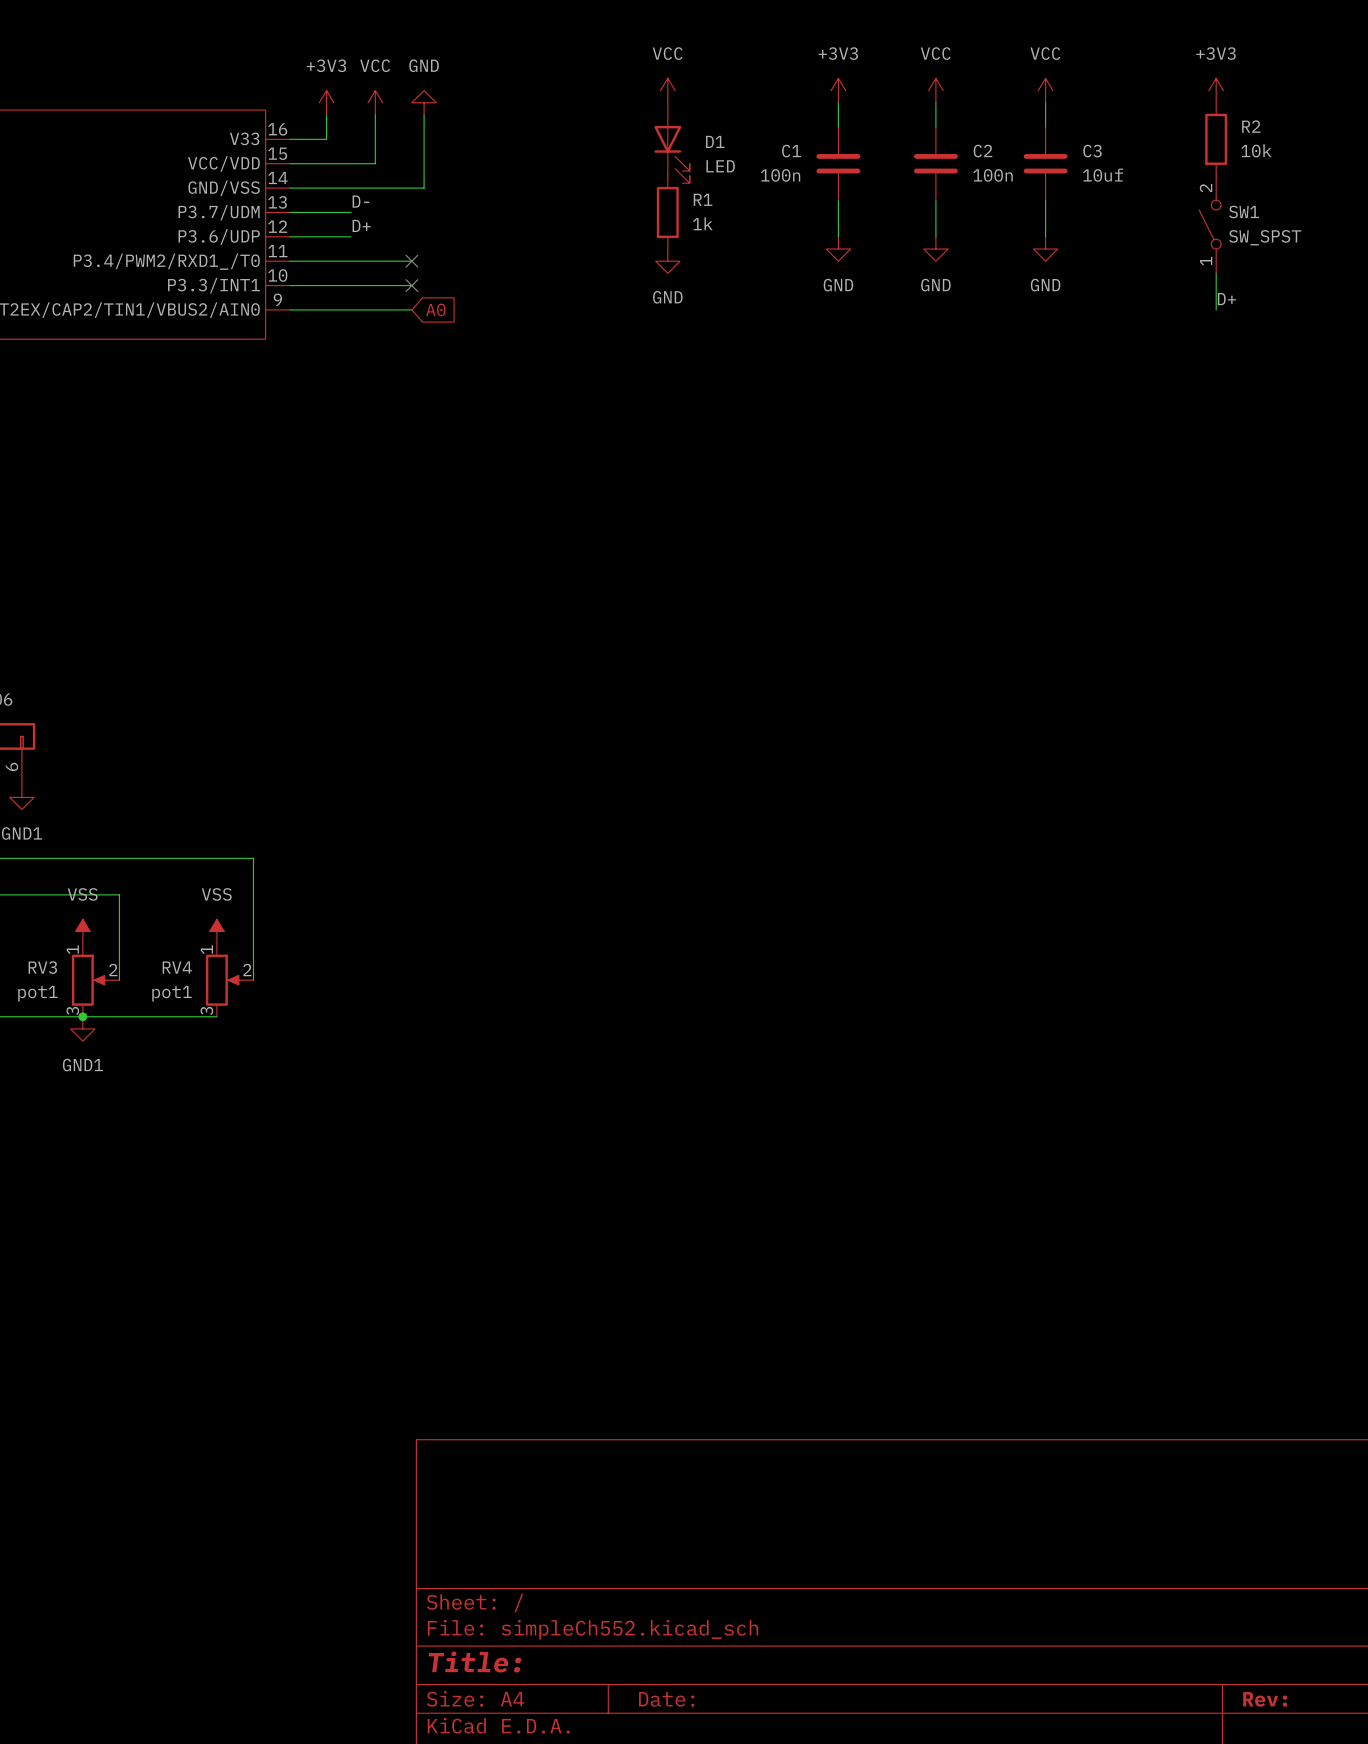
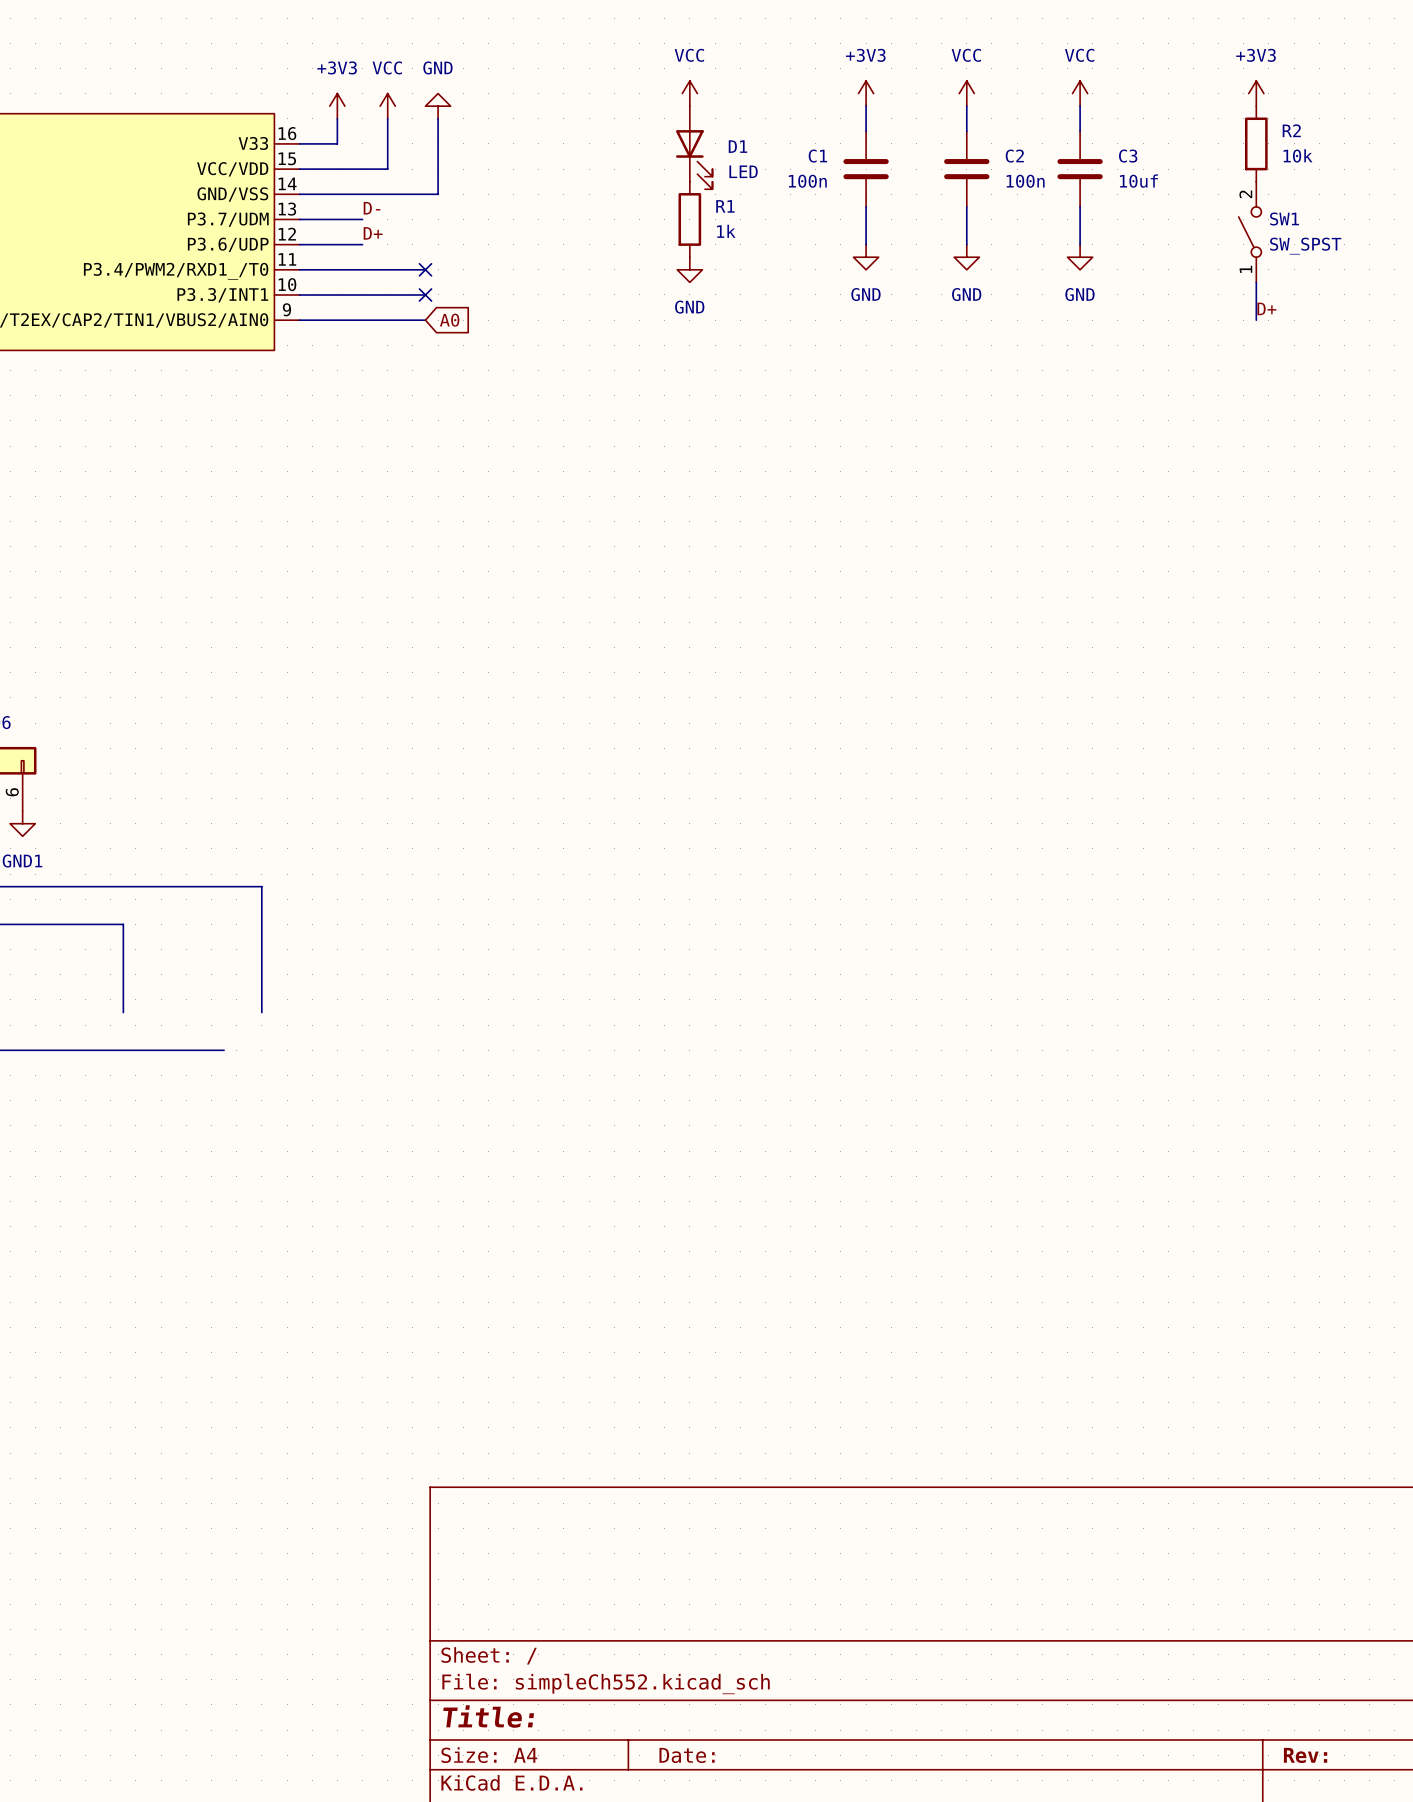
power symbol: VSS (82, 931) -> none
power symbol: VSS (216, 931) -> none
RV3: pot1 (95, 980) -> none
RV4: pot1 (229, 980) -> none
junction: (82, 1016) -> none
power symbol: GND1 (82, 1028) -> none

